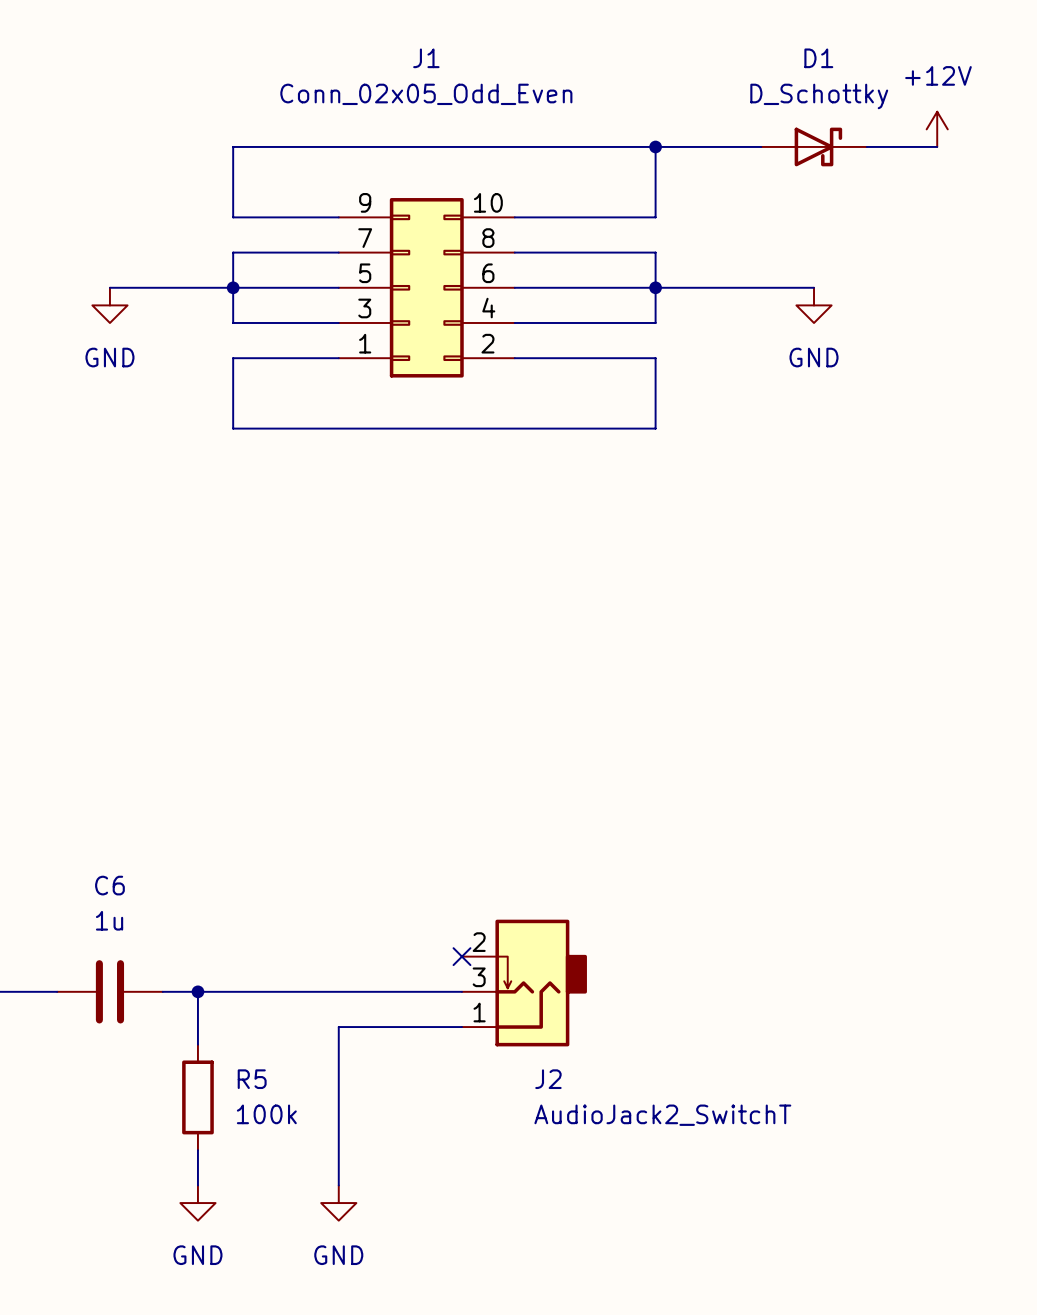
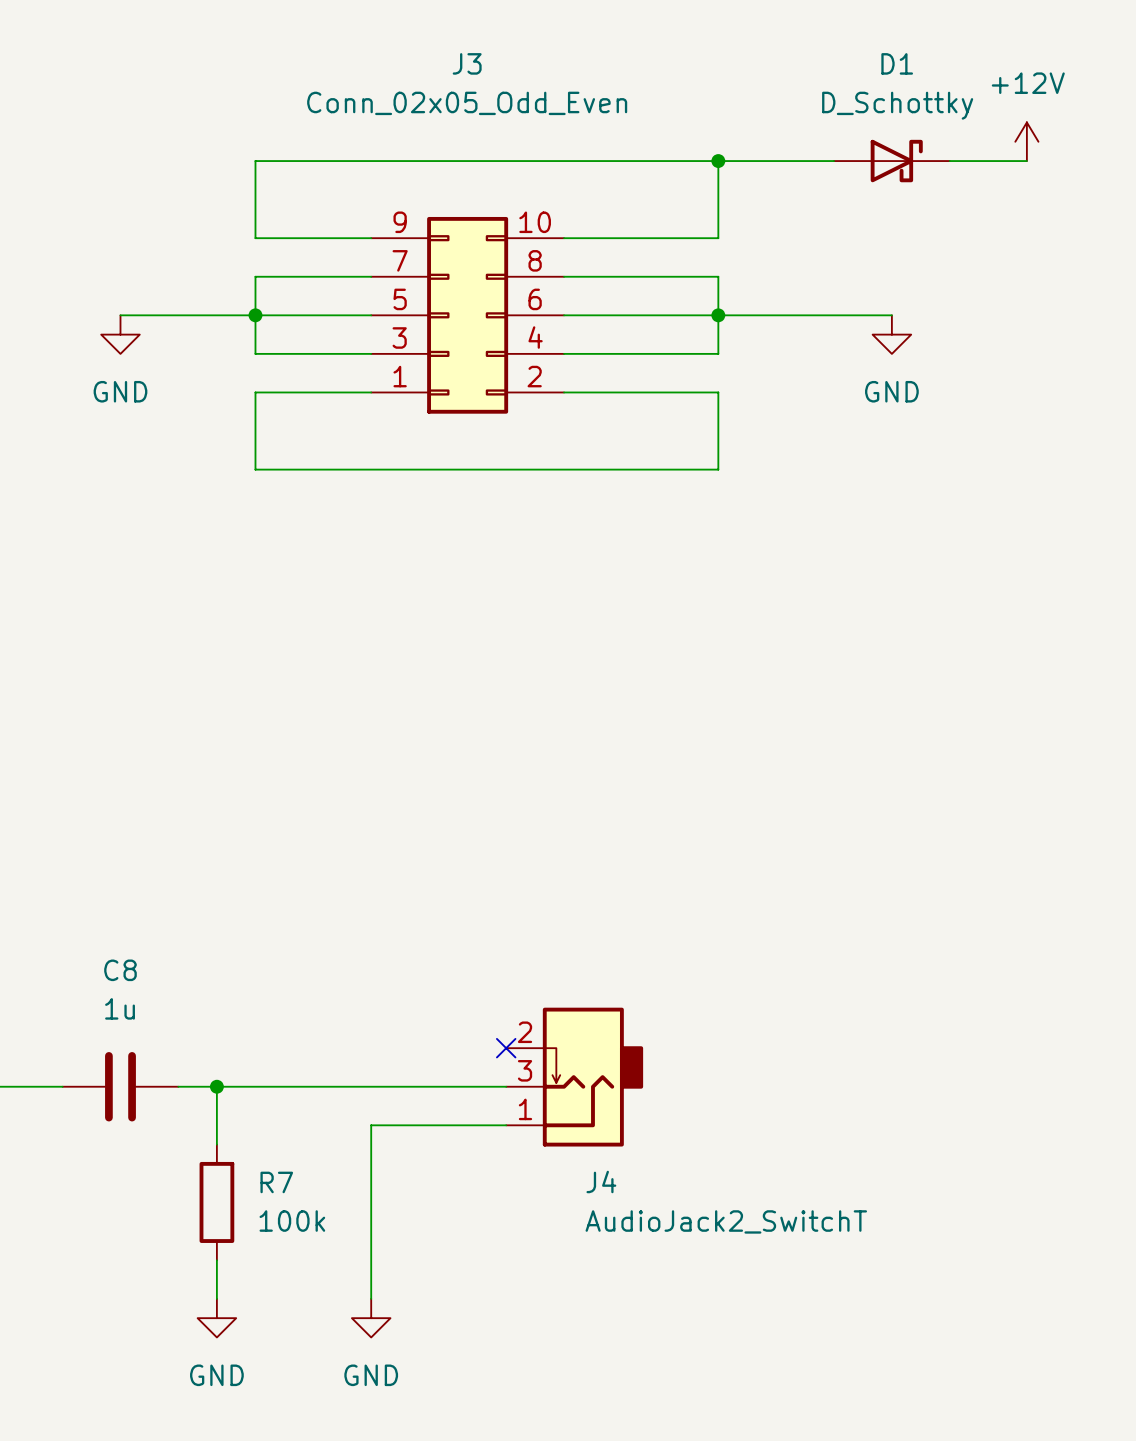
J1 name: J1 (426, 58) -> J3 (467, 63)
C6 name: C6 (109, 885) -> C8 (120, 970)
R5 name: R5 (252, 1079) -> R7 (276, 1182)
J2 name: J2 (548, 1079) -> J4 (601, 1181)

